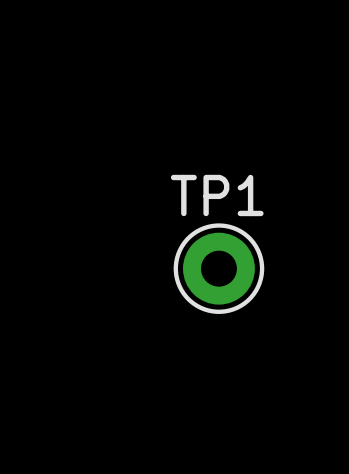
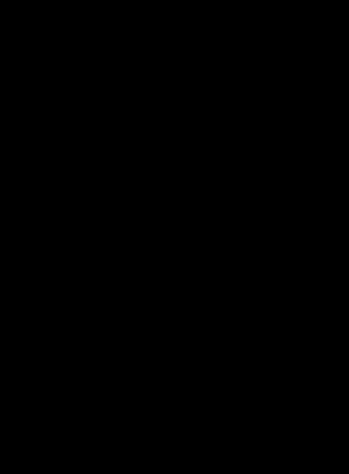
TP1: (218, 268) -> none

